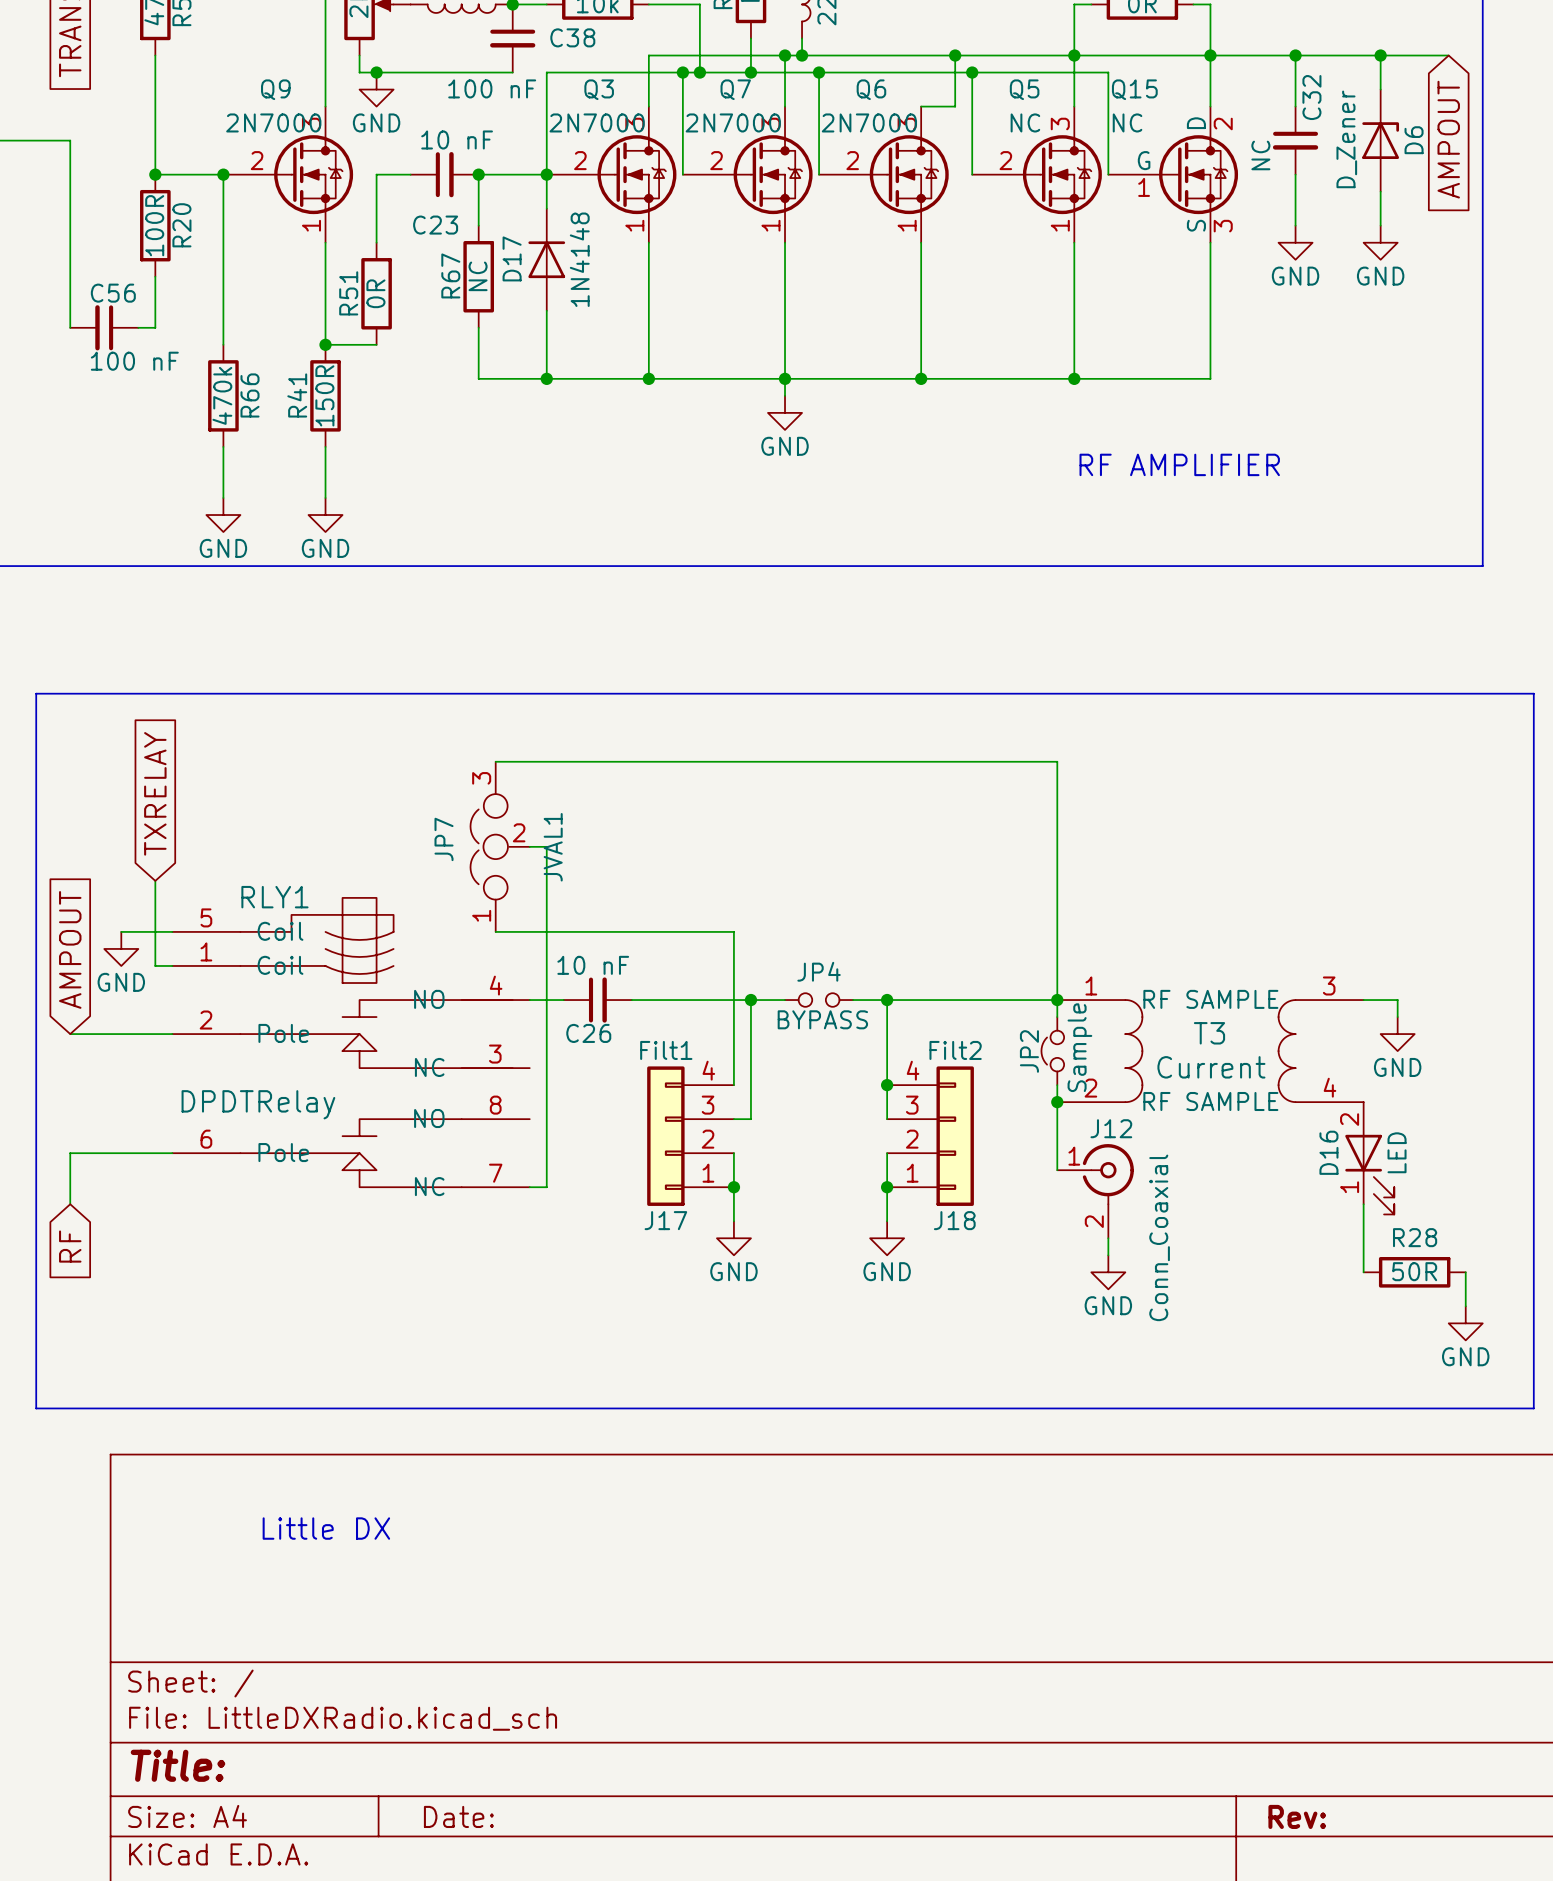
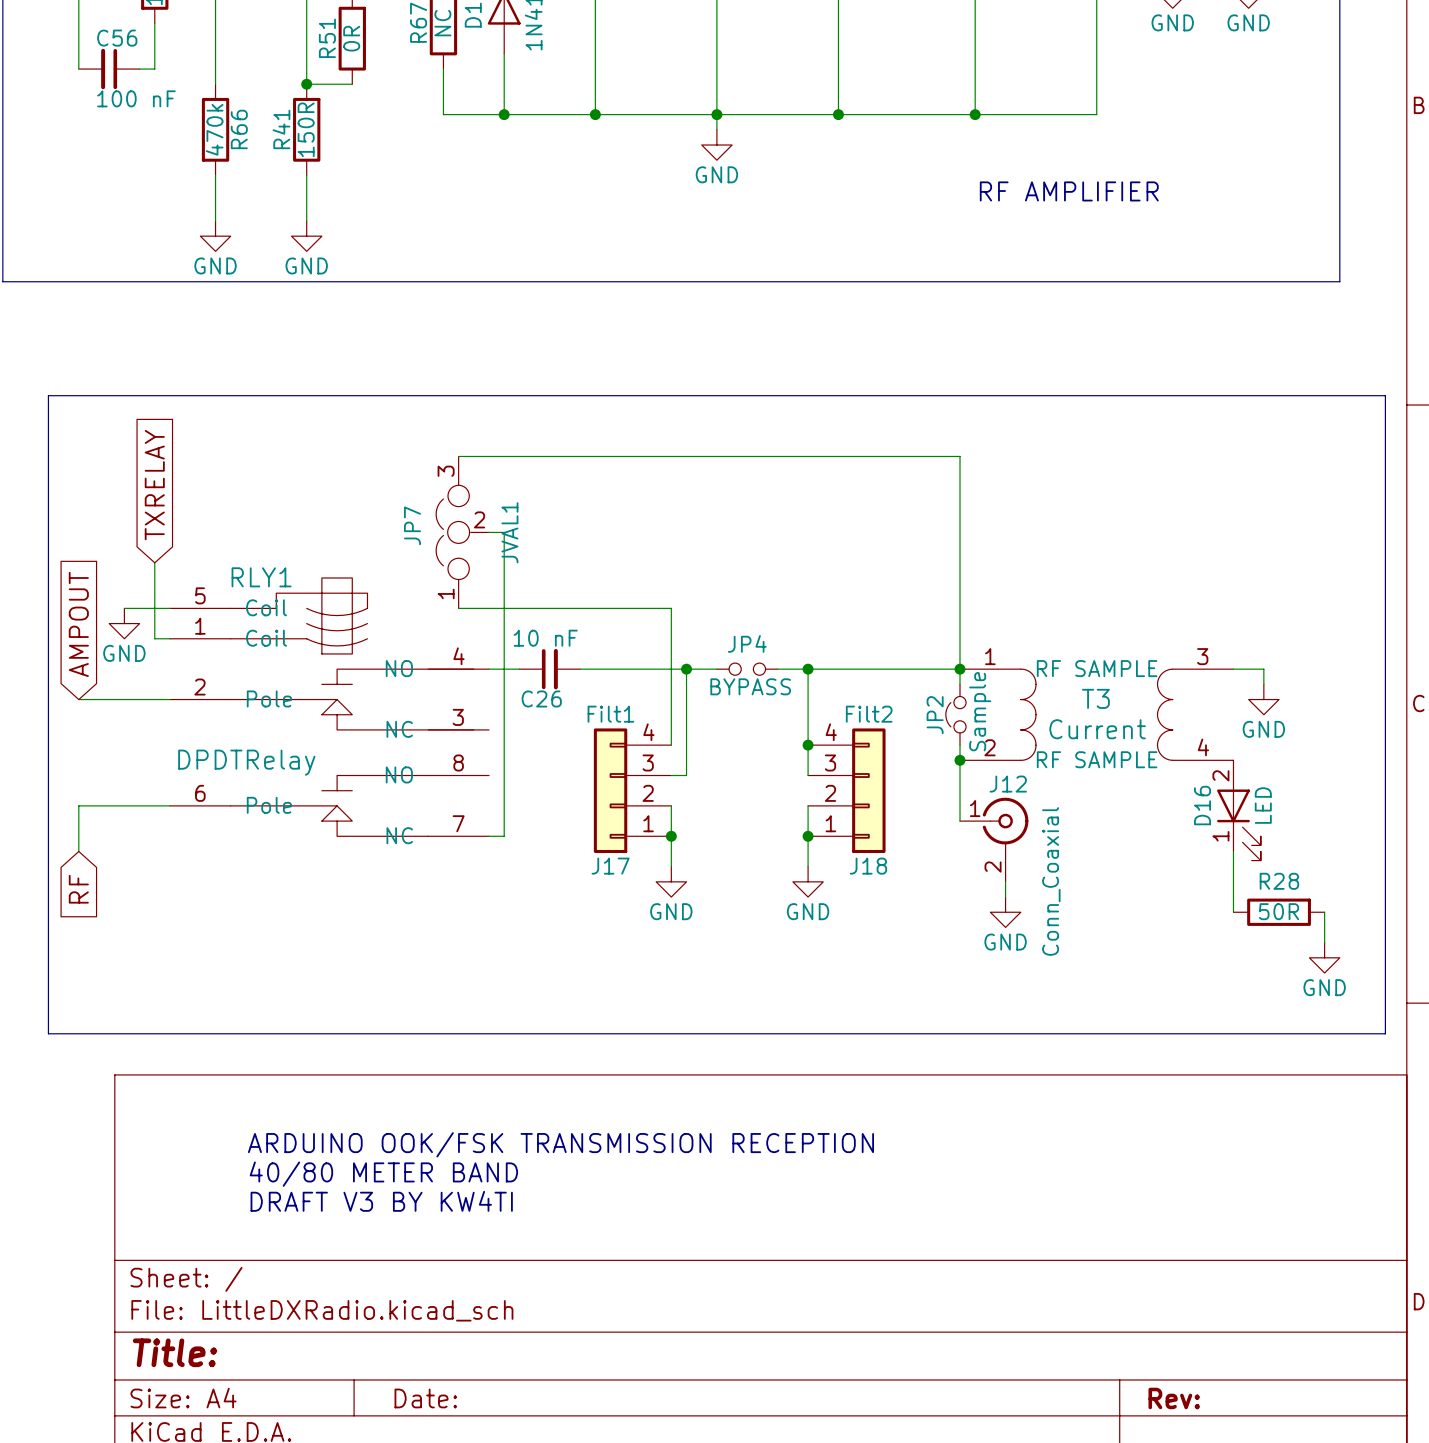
text: Little DX (326, 1528) -> ARDUINO OOK/FSK TRANSMISSION RECEPTION (560, 1144)
text: none -> 40/80 METER BAND (383, 1174)
text: none -> DRAFT V3 BY KW4TI (381, 1201)

